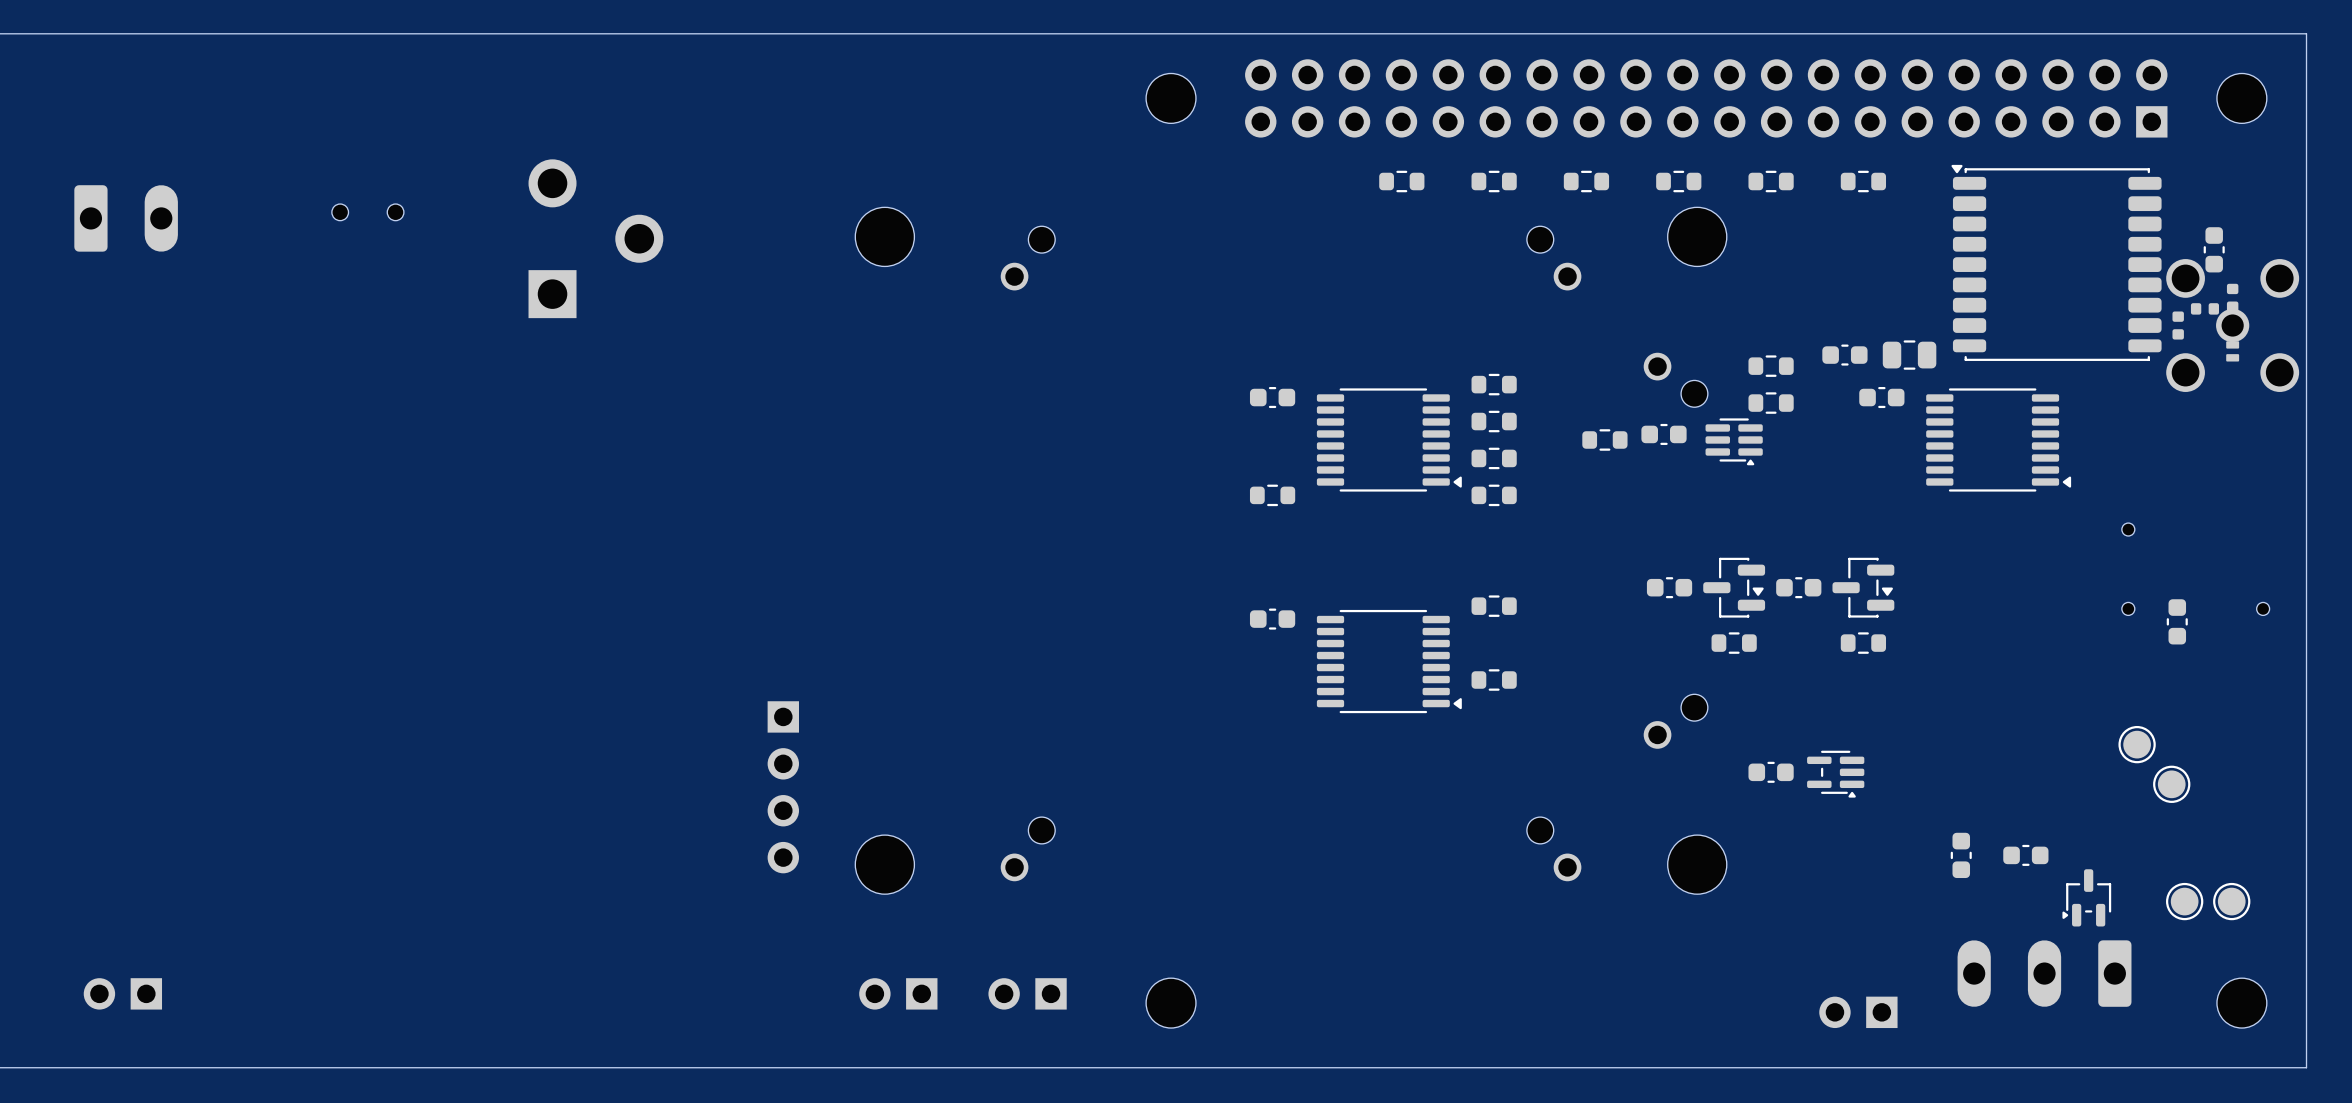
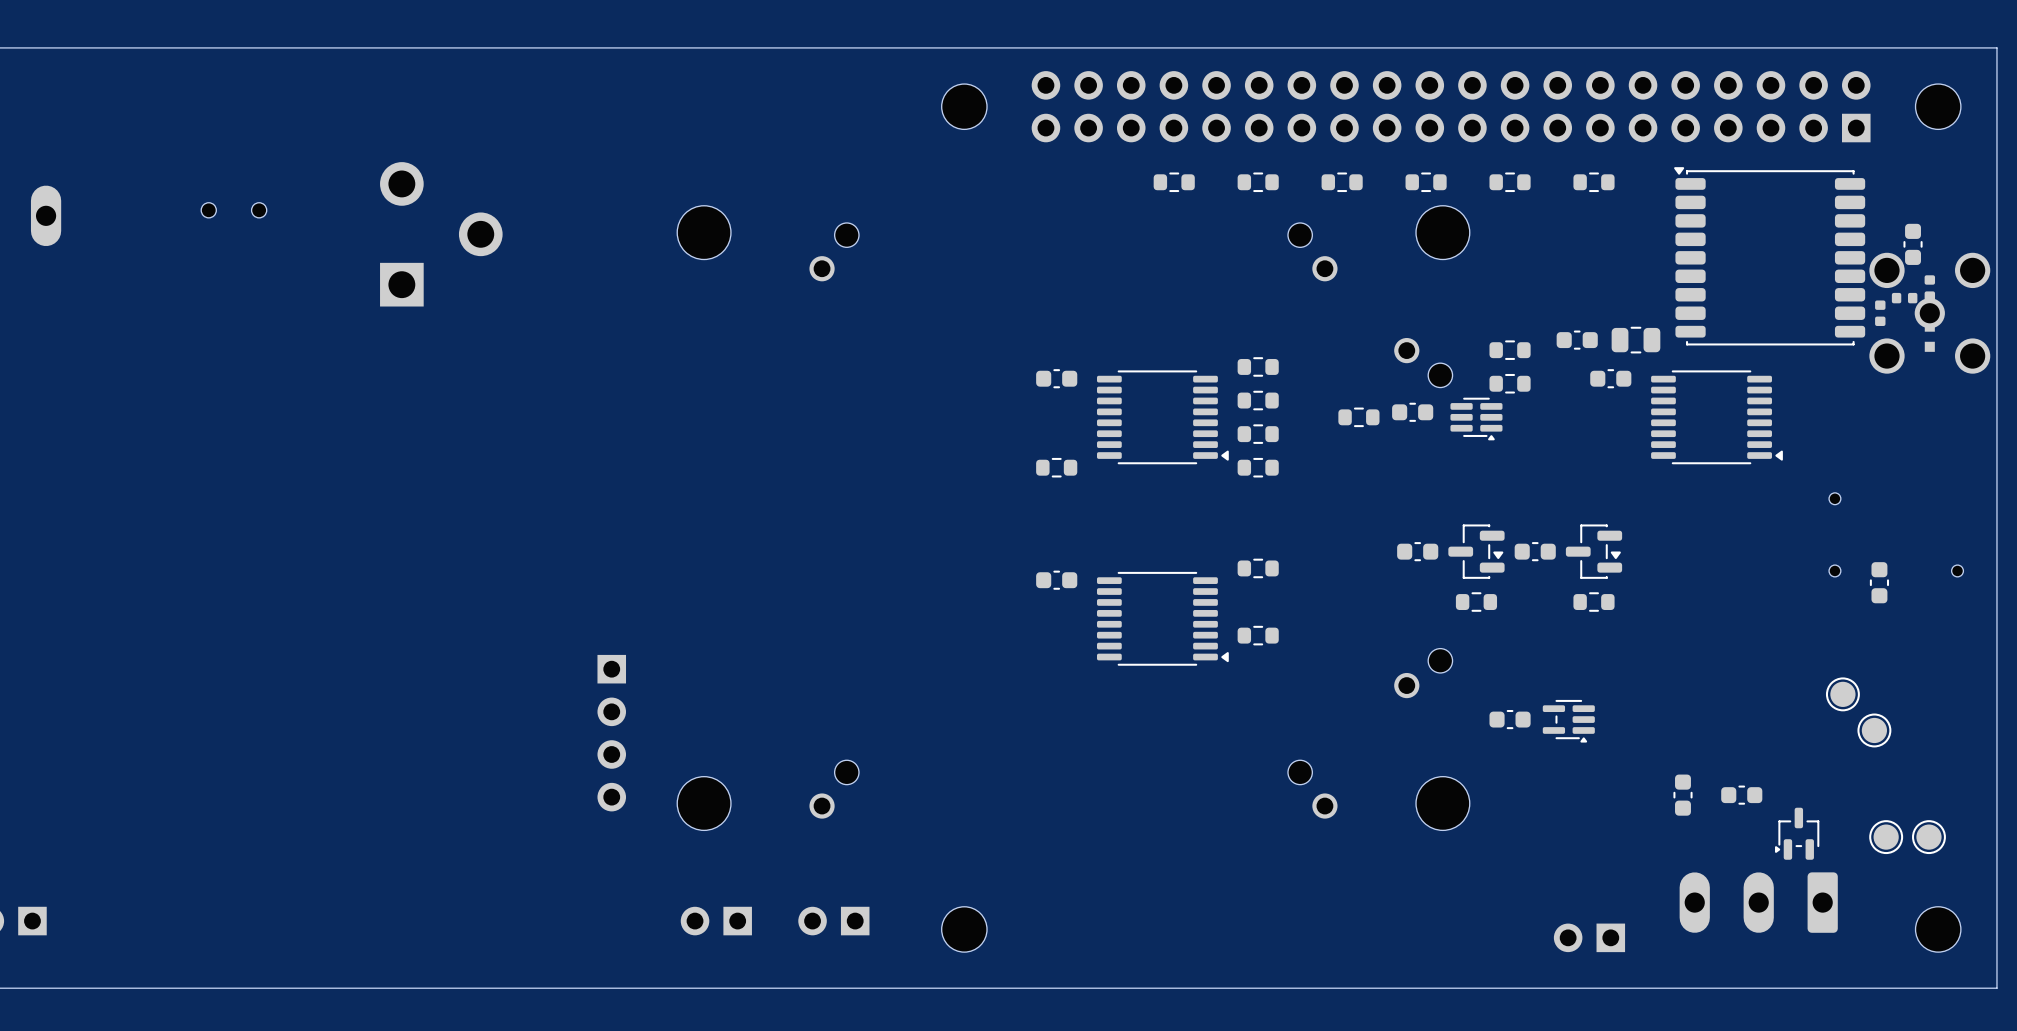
part footprint: [2226, 341, 2240, 362] -> [1924, 321, 1935, 352]

